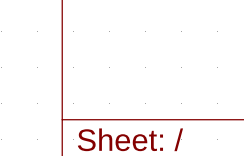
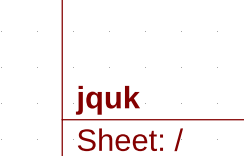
title block: none -> jquk (107, 100)

